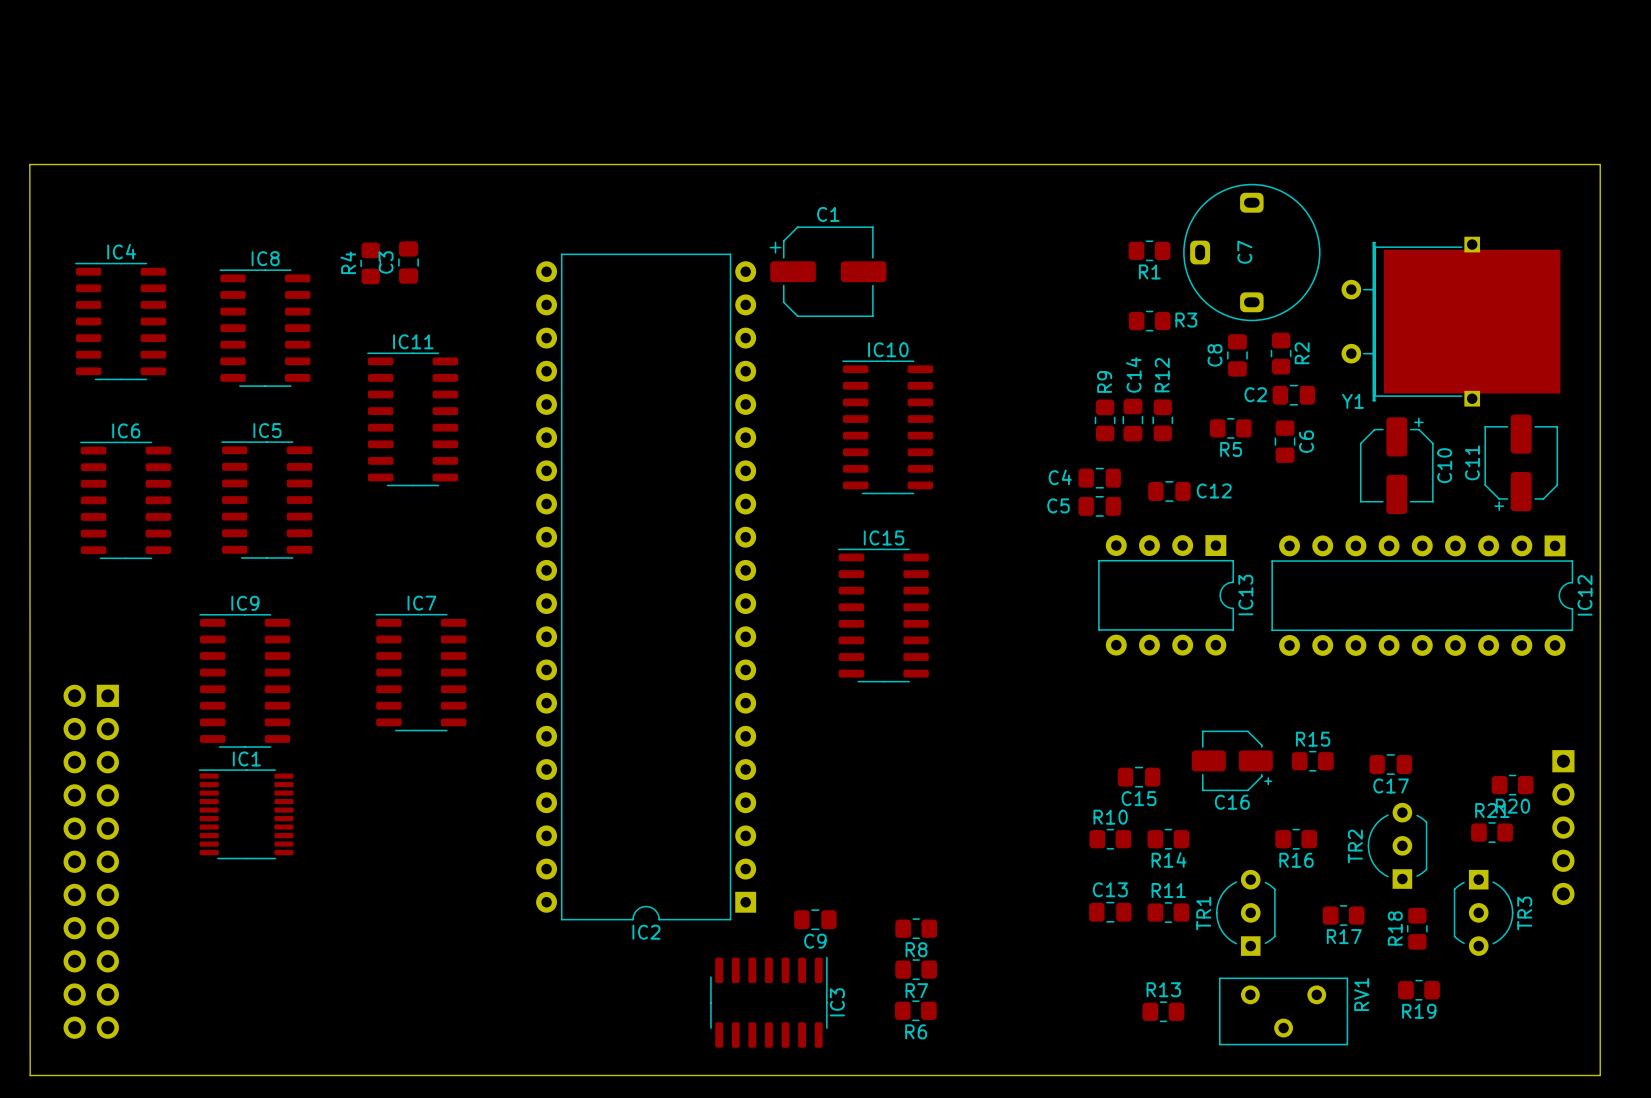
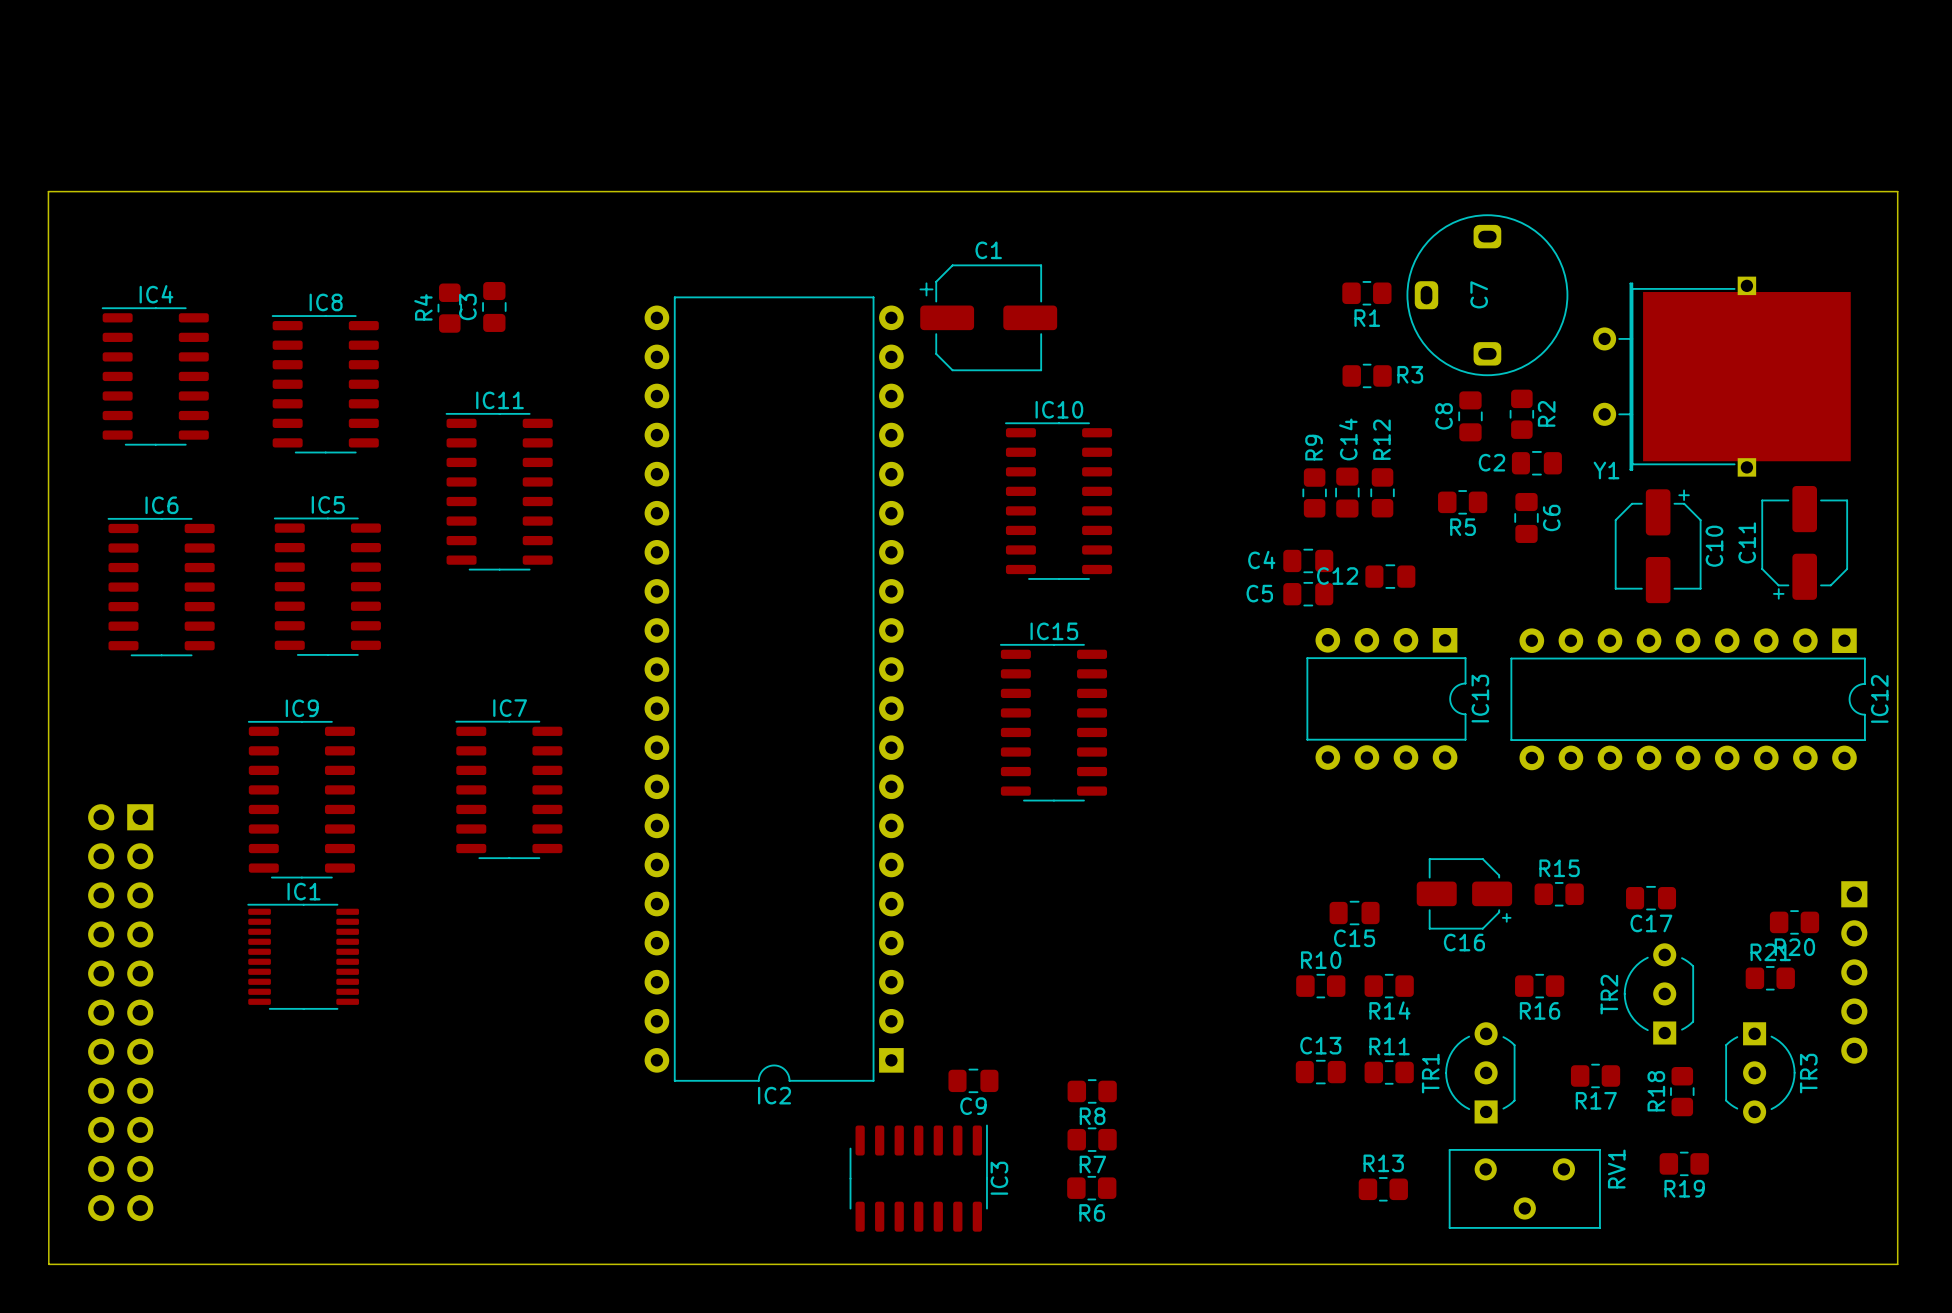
C12 name position: C12 (1214, 490) -> C12 (1337, 576)

